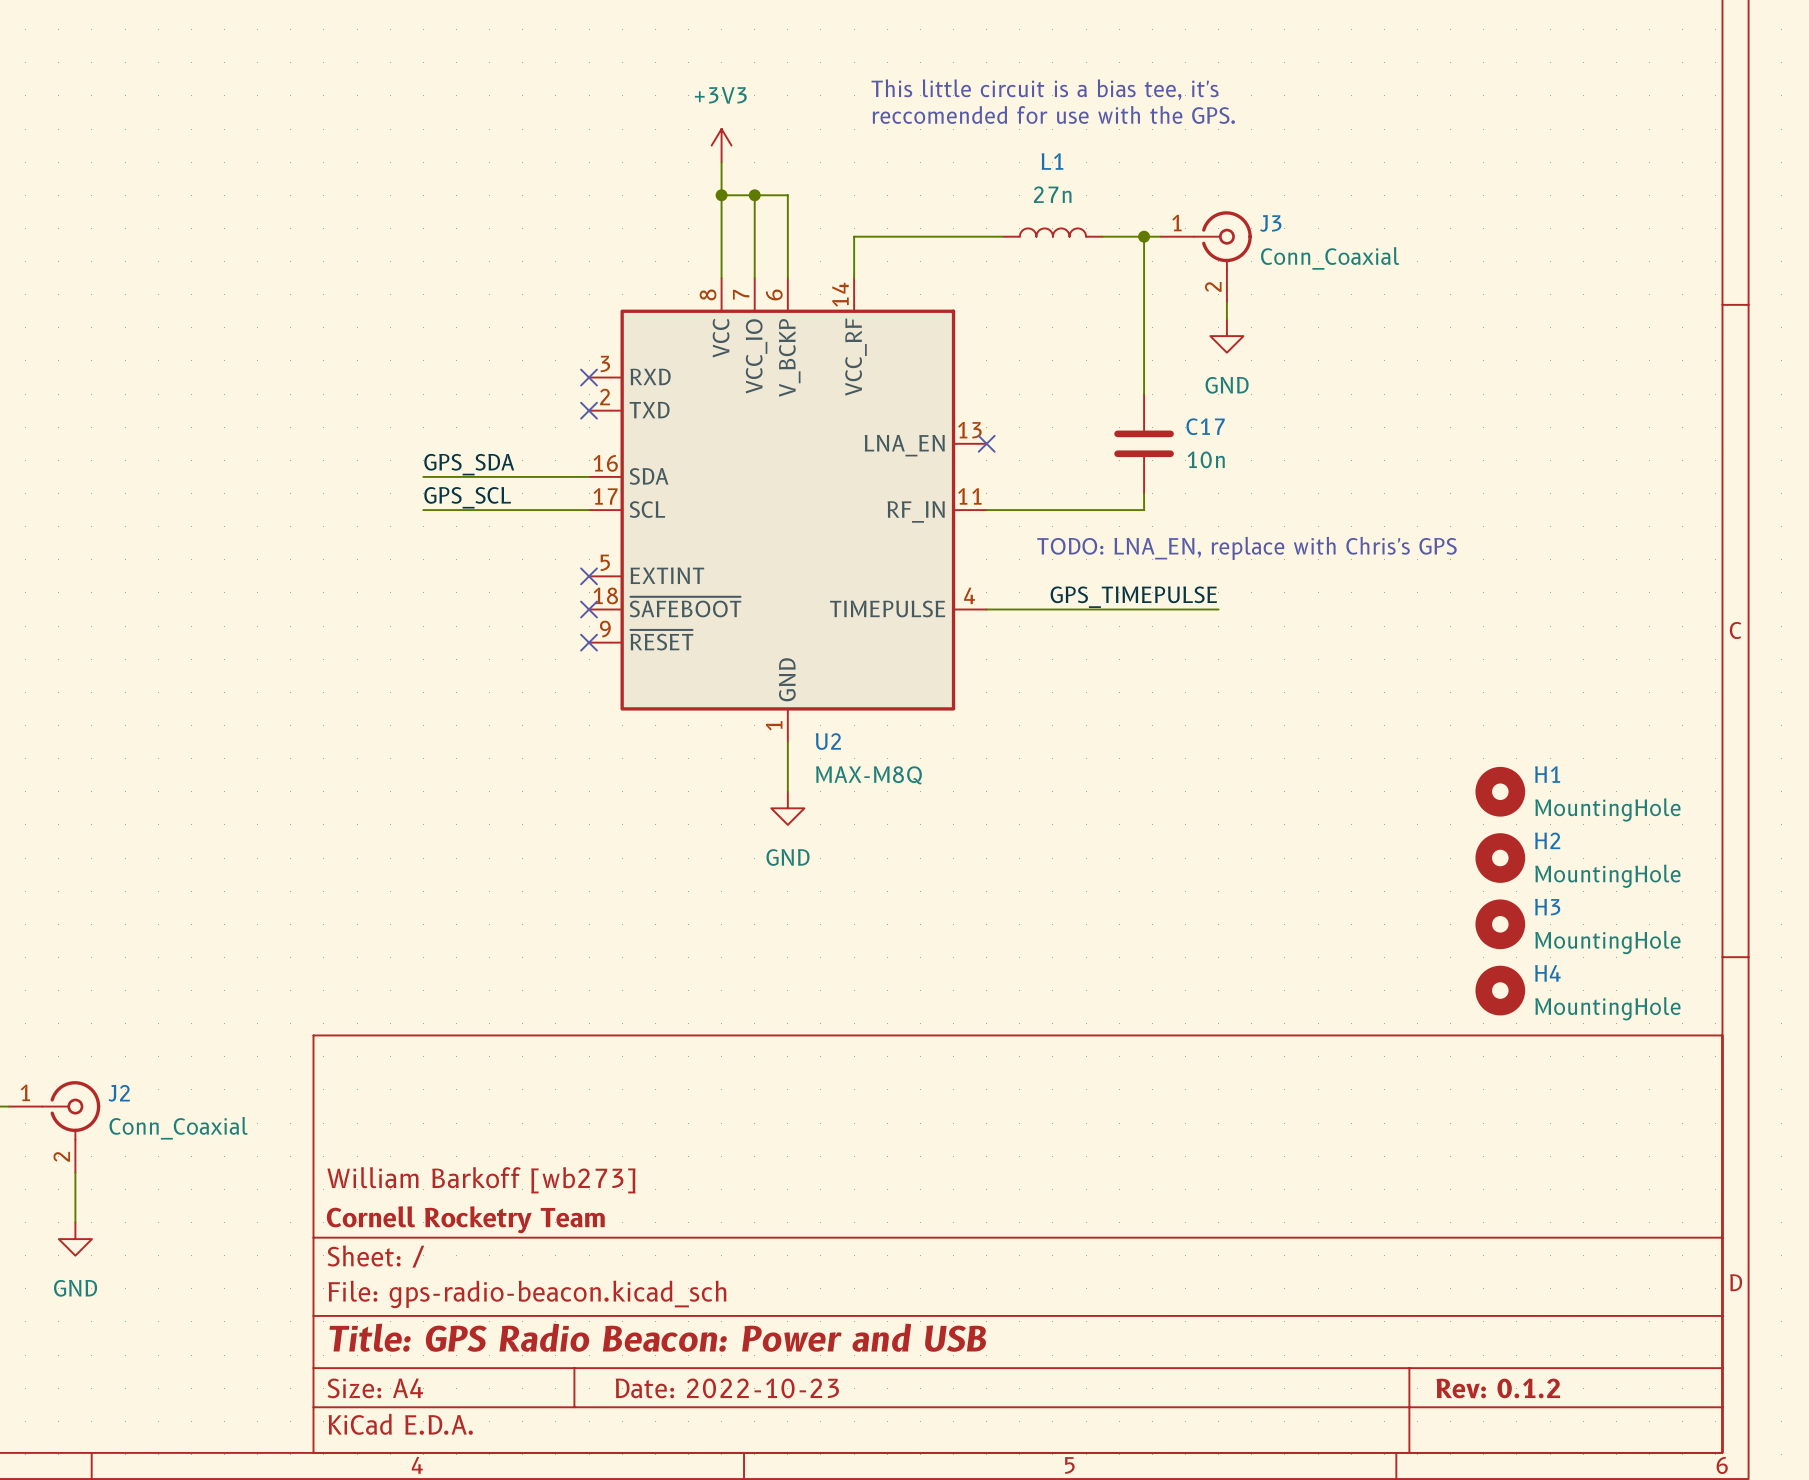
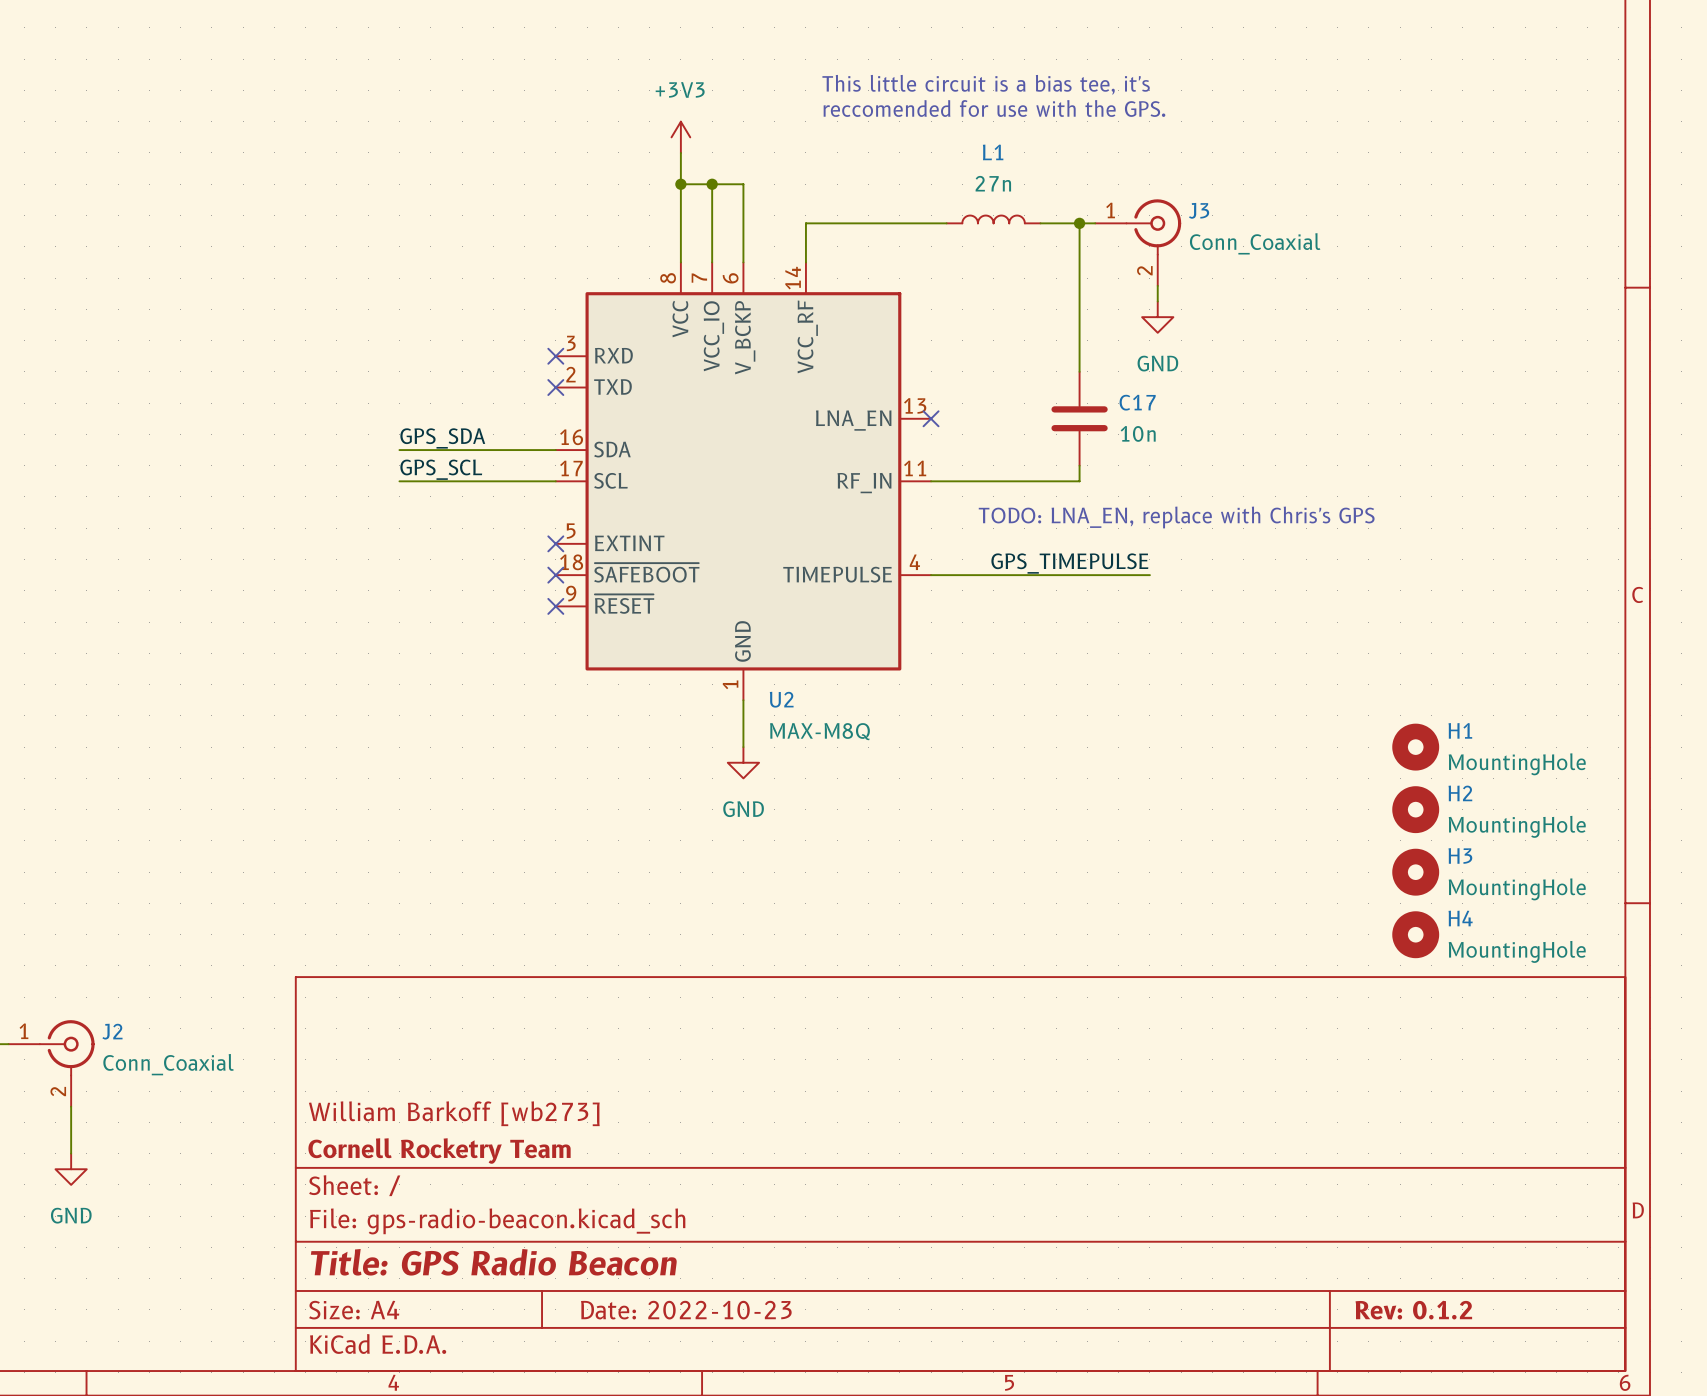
title block: Title: GPS Radio Beacon: Power and USB (657, 1337) -> Title: GPS Radio Beacon (493, 1262)

